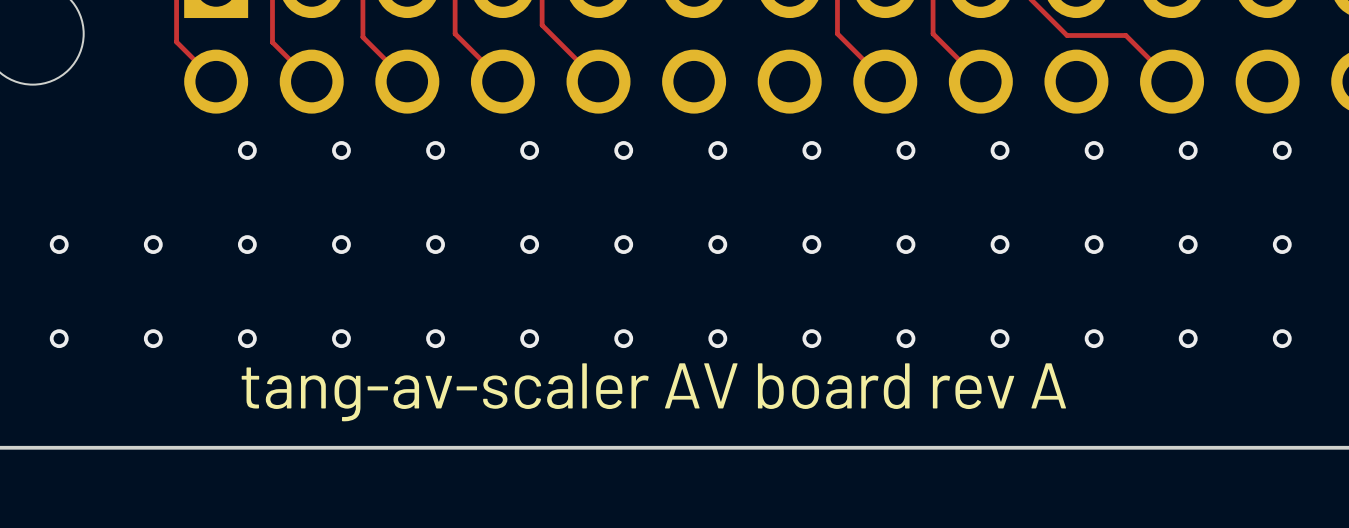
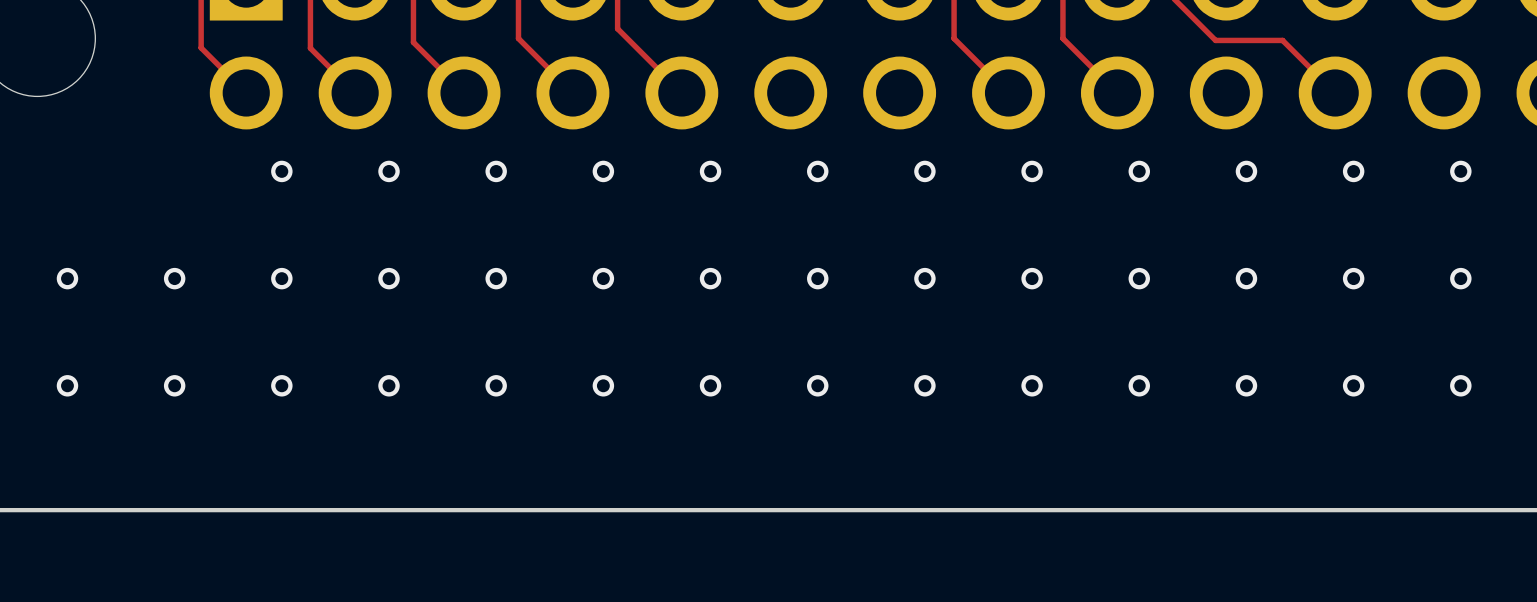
text: tang-av-scaler AV board rev A (653, 392) -> none

